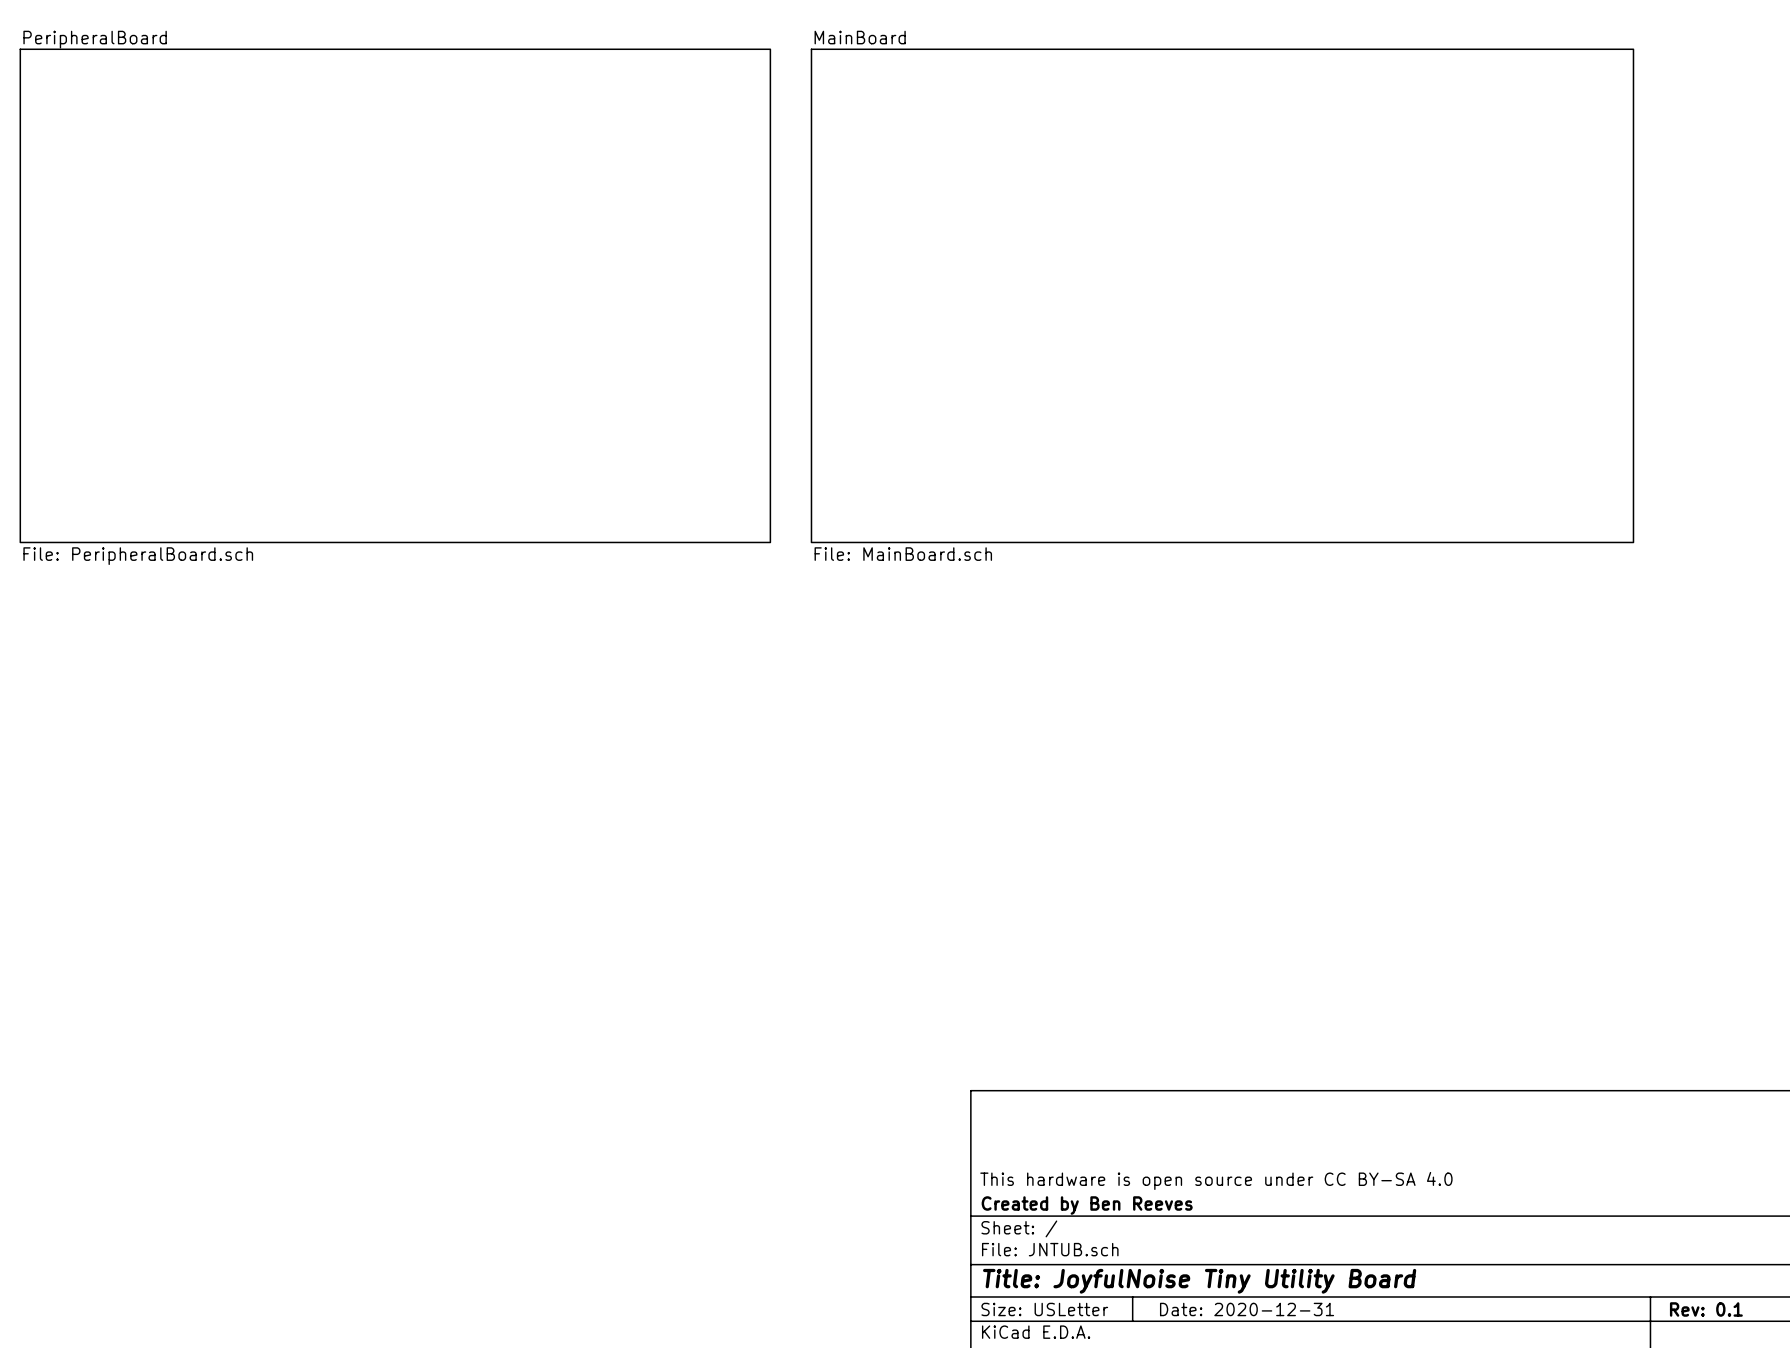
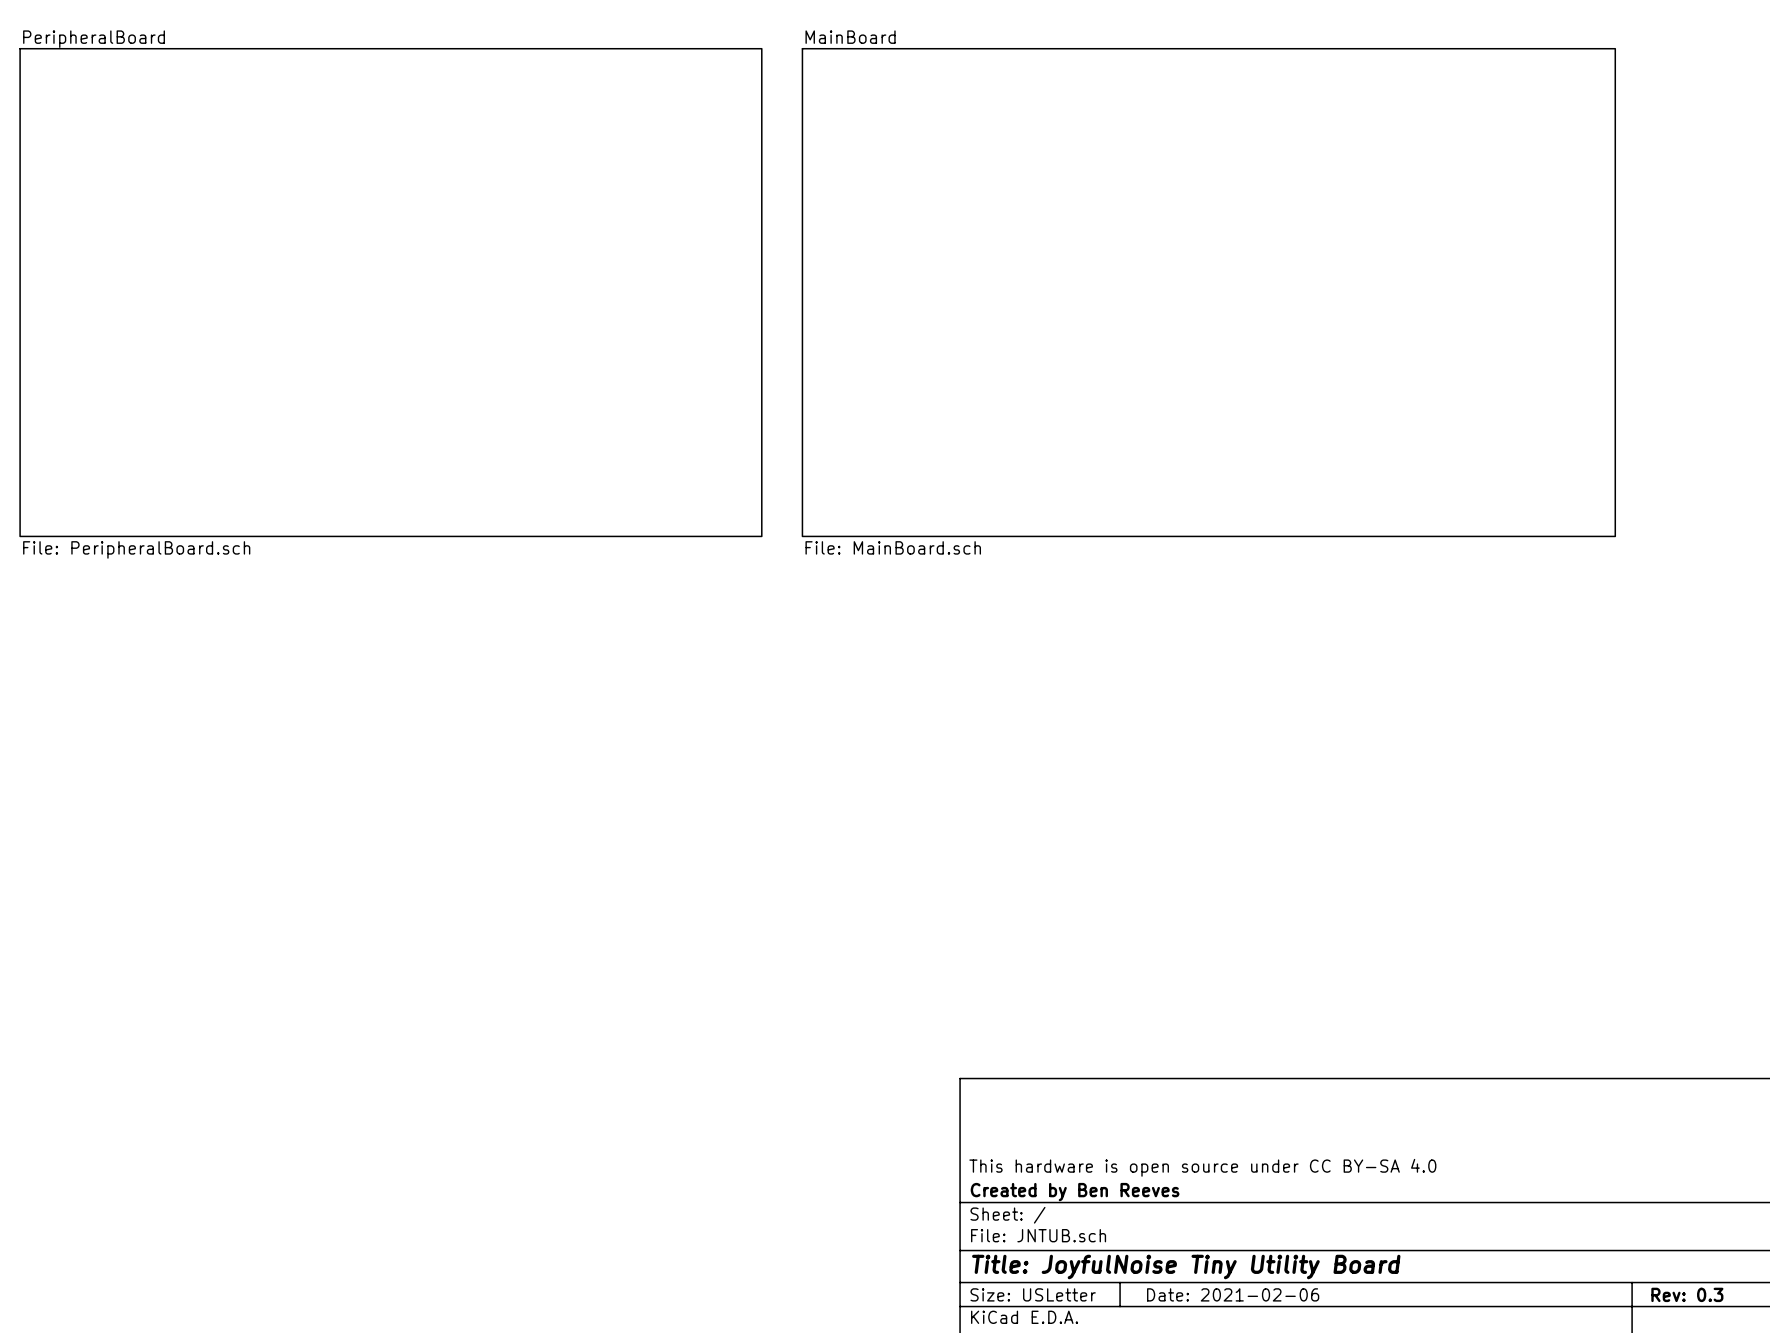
title block: Date: 2020-12-31 (1247, 1309) -> Date: 2021-02-06 (1233, 1294)
title block: Rev: 0.1 (1706, 1309) -> Rev: 0.3 (1687, 1294)

